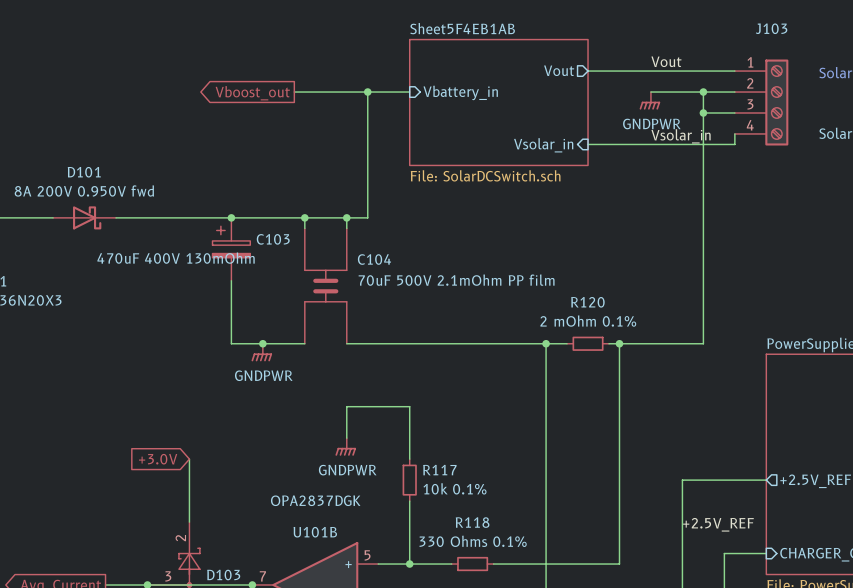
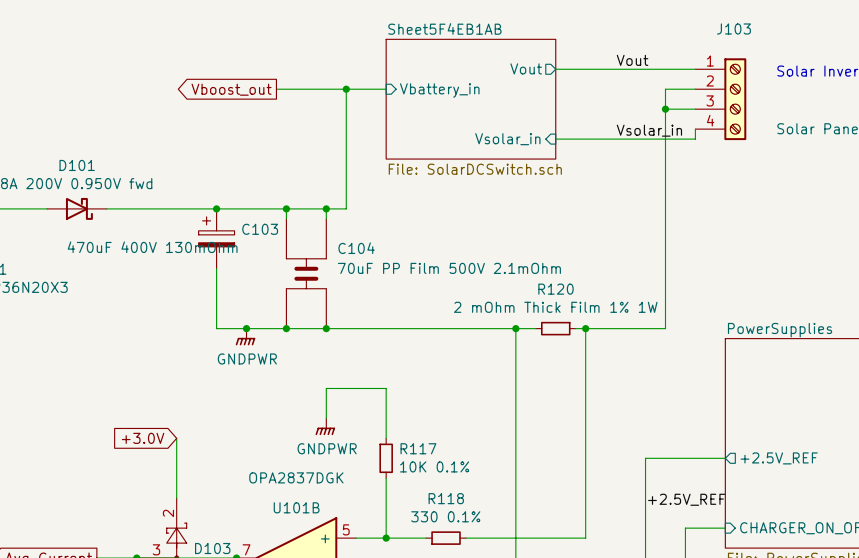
wire: (650, 92) (703, 92) -> none
junction: (703, 92) -> none
power symbol: GNDPWR (649, 100) -> none
C104 value: 70uF 500V 2.1mOhm PP film (456, 280) -> 70uF PP Film 500V 2.1mOhm (449, 268)
R120 value: 2 mOhm 0.1% (588, 321) -> 2 mOhm Thick Film 1% 1W (555, 307)
wire: none -> (286, 328) (326, 328)
junction: none -> (286, 328)
junction: none -> (326, 328)
R117 value: 10k 0.1% (454, 488) -> 10K 0.1% (434, 466)
R118 value: 330 Ohms 0.1% (473, 541) -> 330 0.1% (445, 516)

